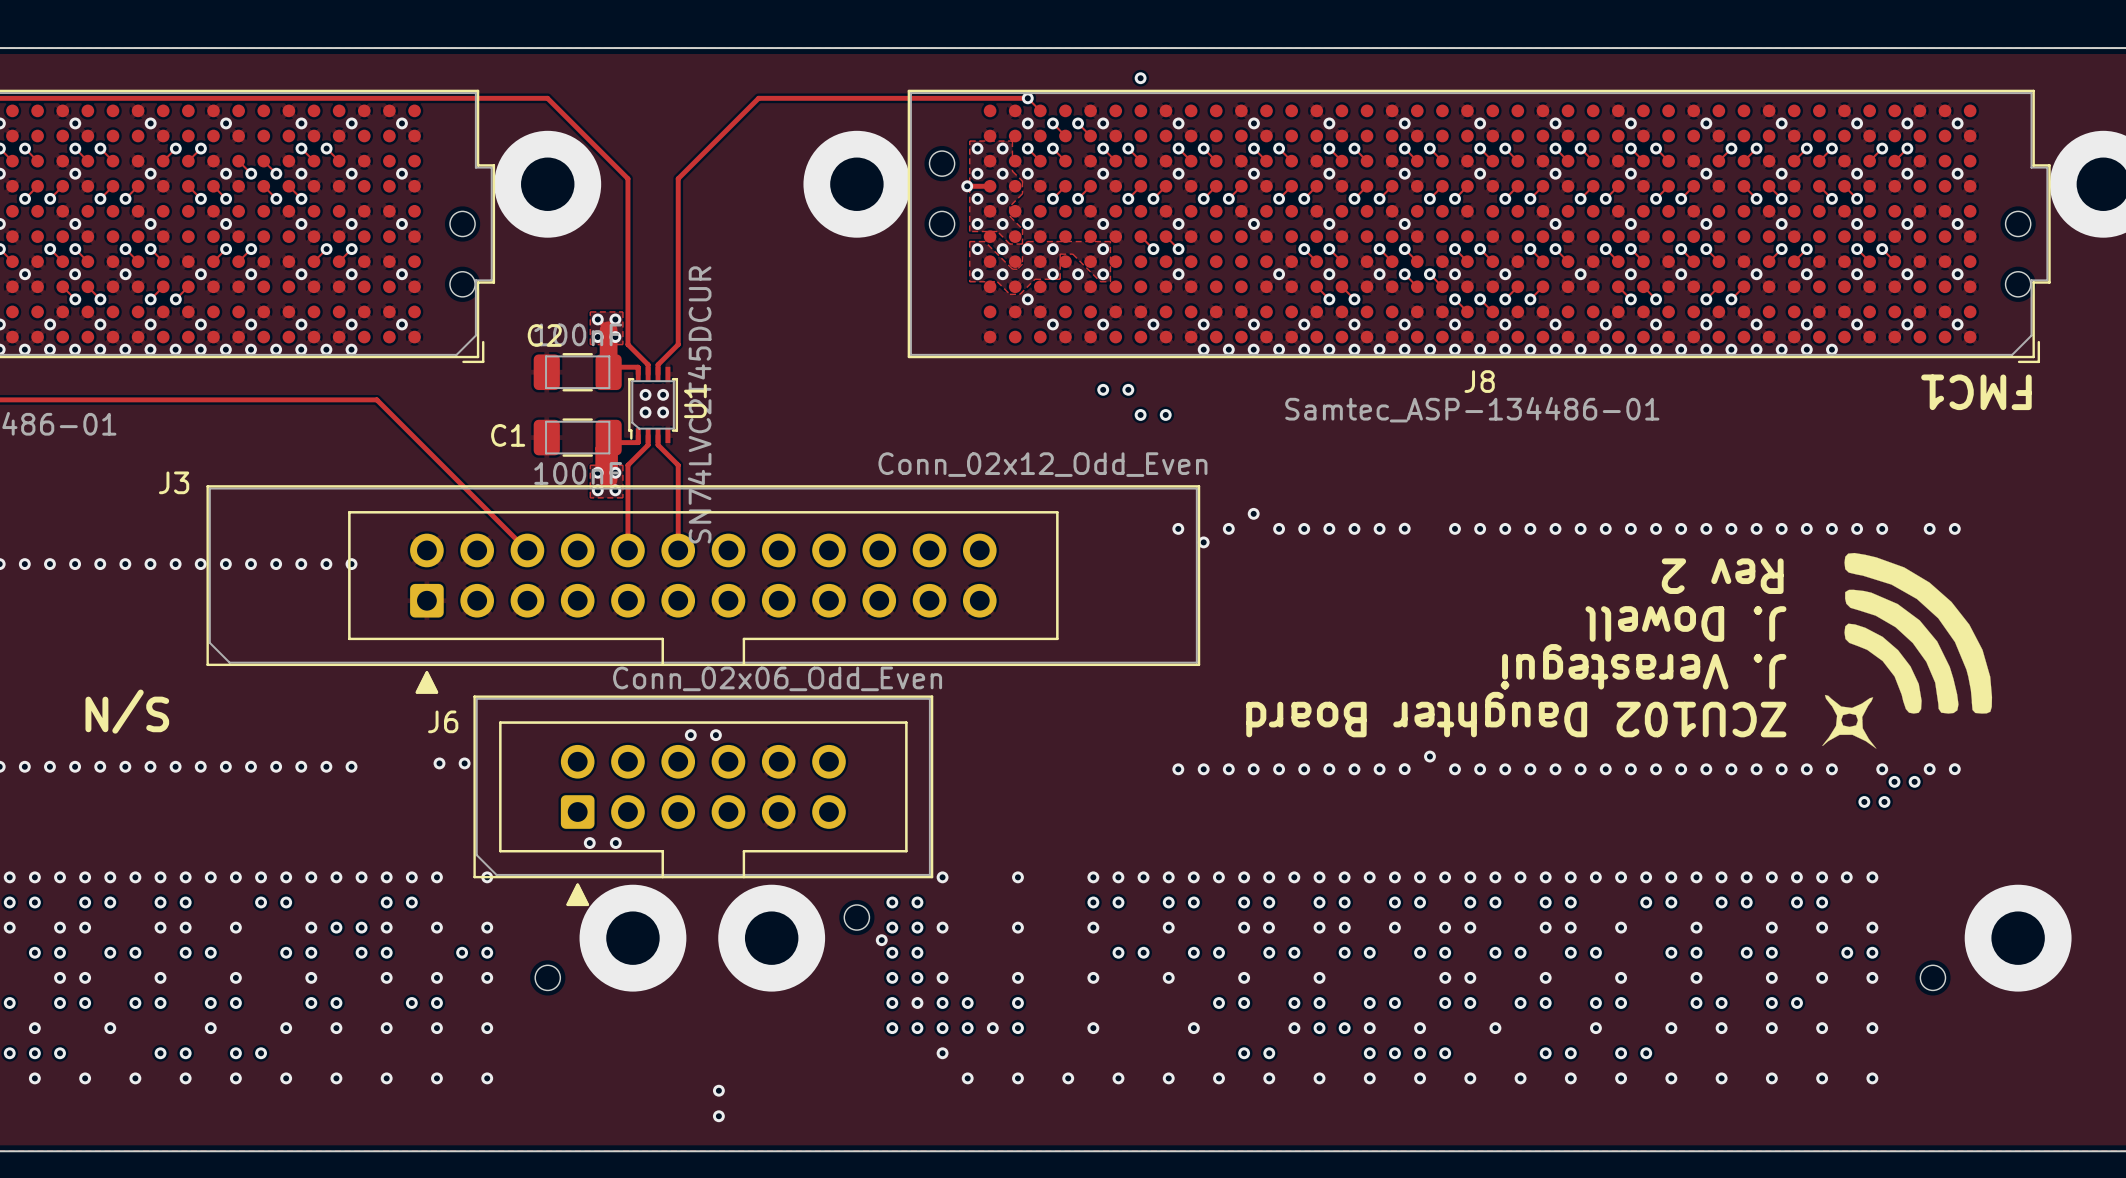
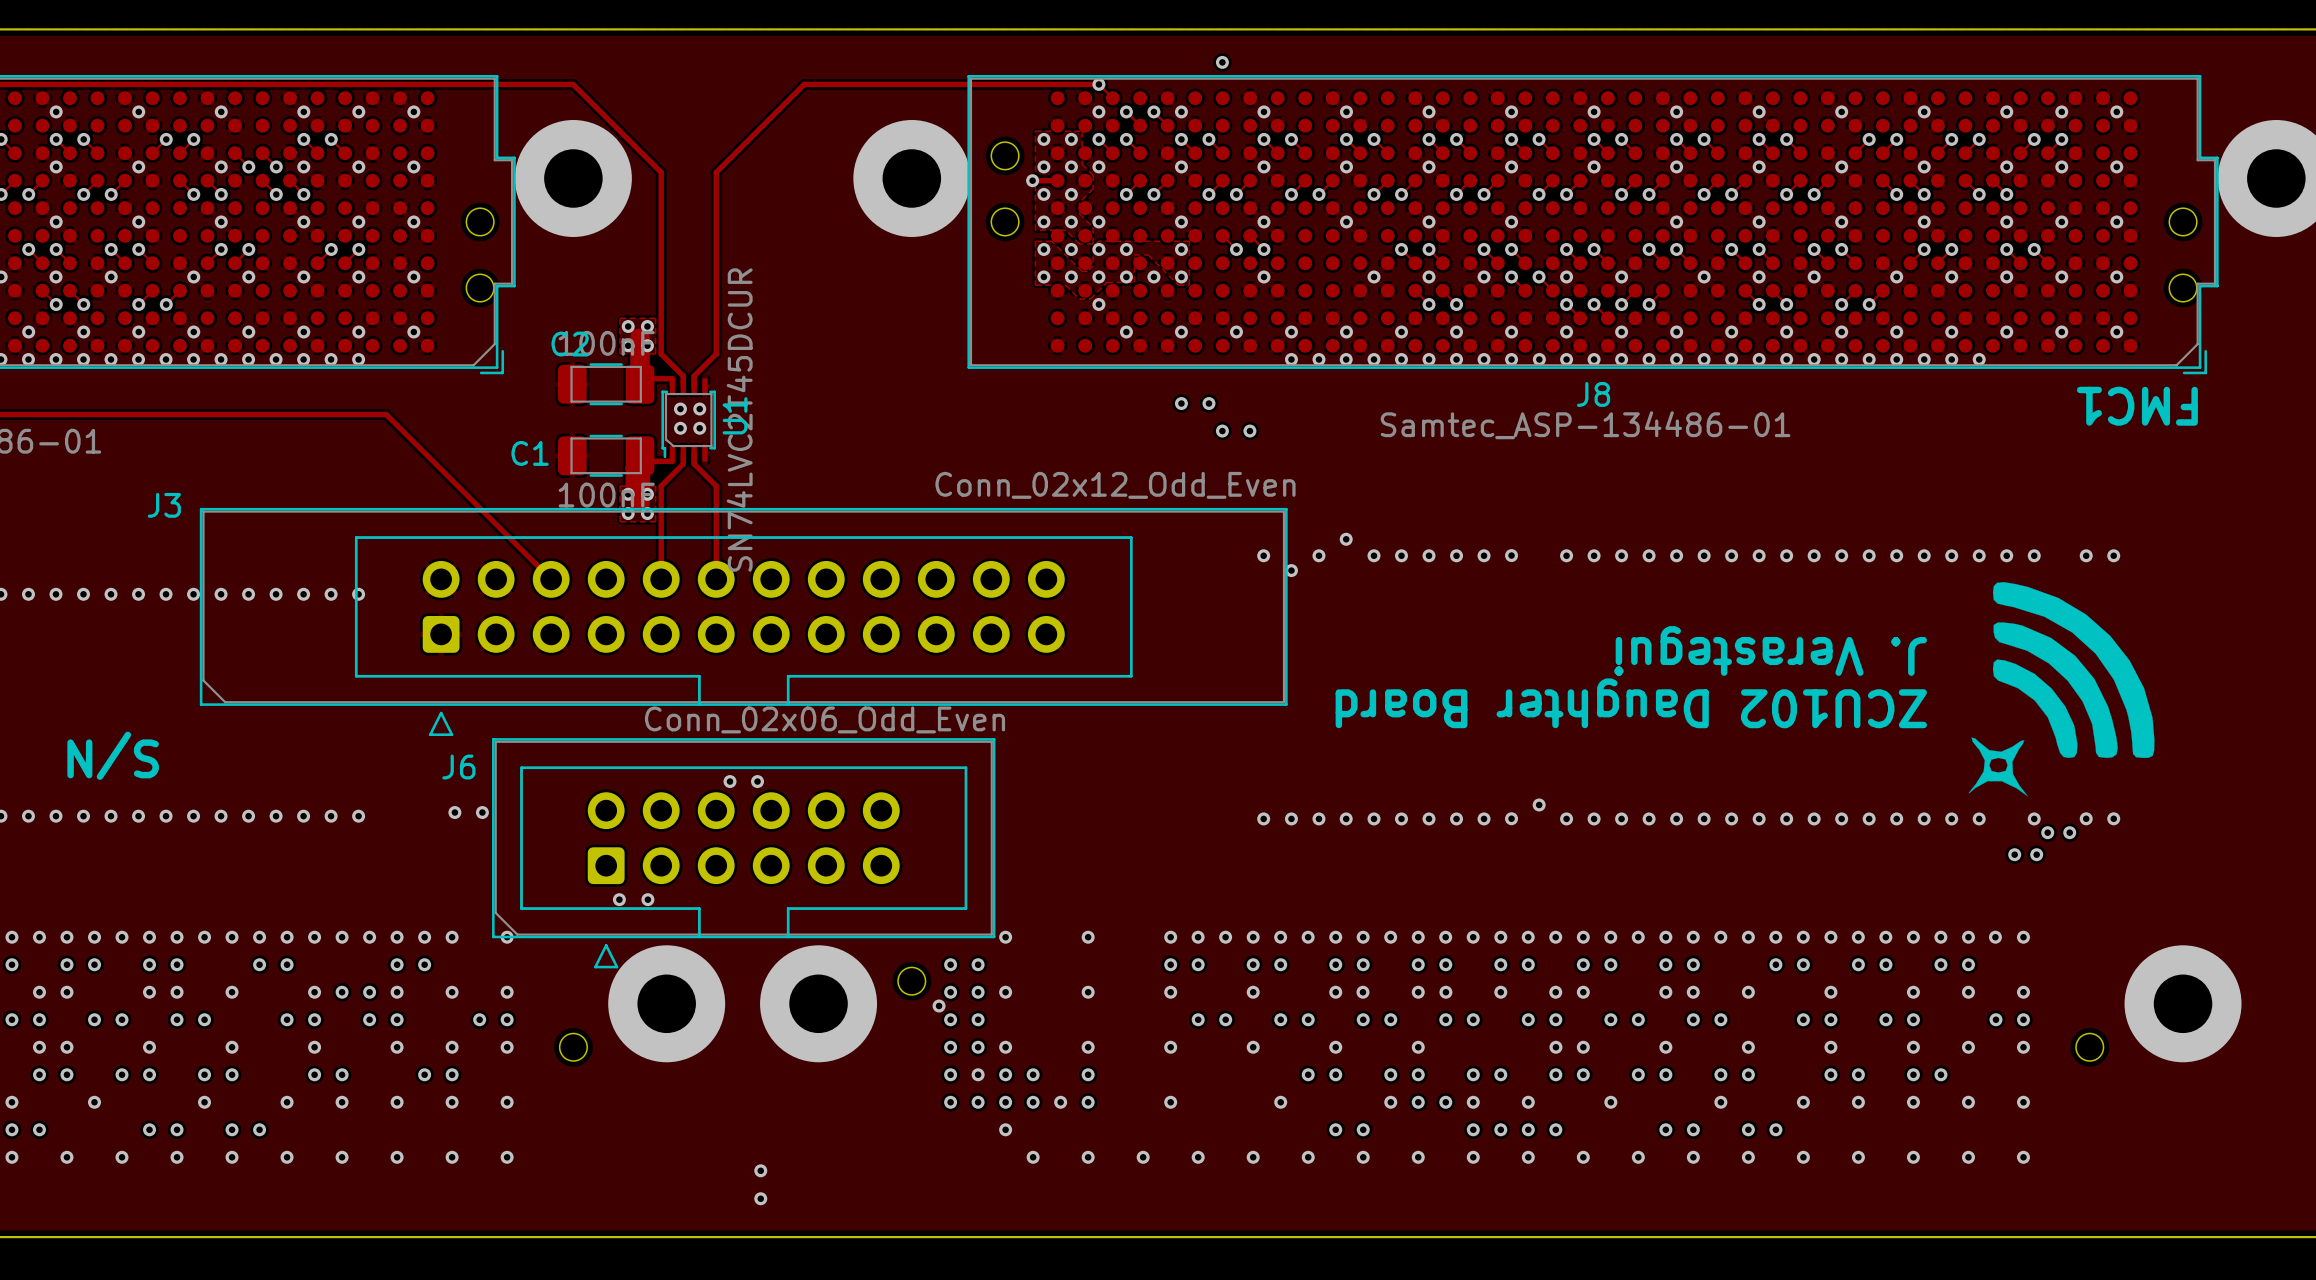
text: Rev 2 (1722, 576) -> none
text: J. Dowell (1685, 623) -> none
text position: J. Verastegui (1643, 666) -> J. Verastegui (1770, 651)
drawing: [415, 671, 439, 694] -> none
text position: ZCU102 Daughter Board (1516, 714) -> ZCU102 Daughter Board (1631, 703)
drawing: [566, 883, 590, 907] -> none

